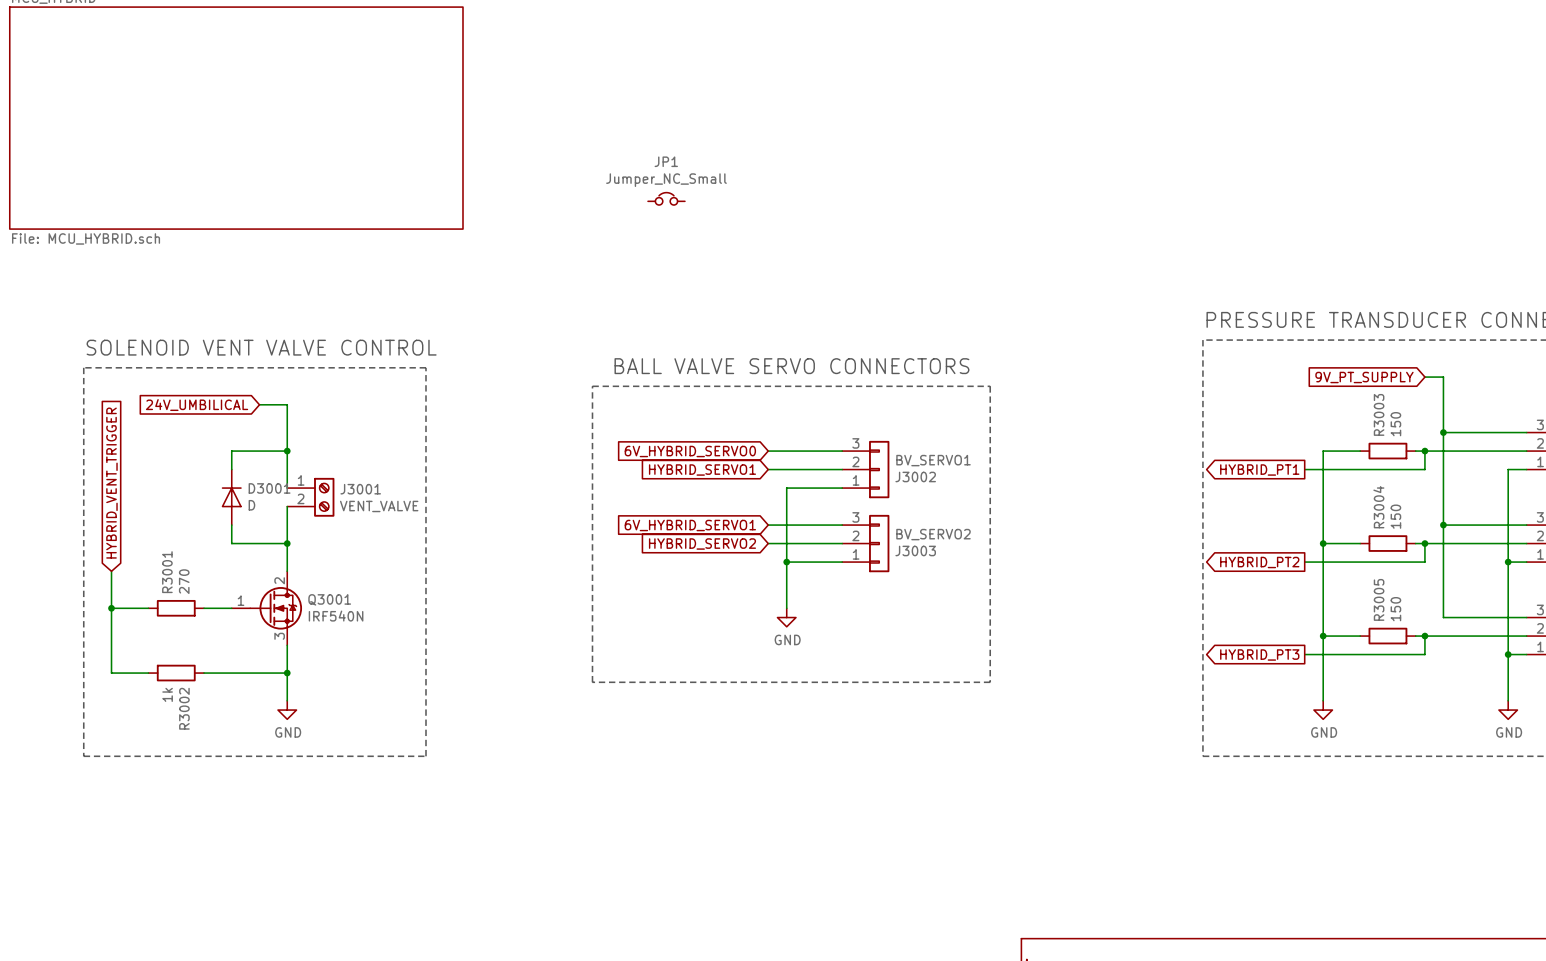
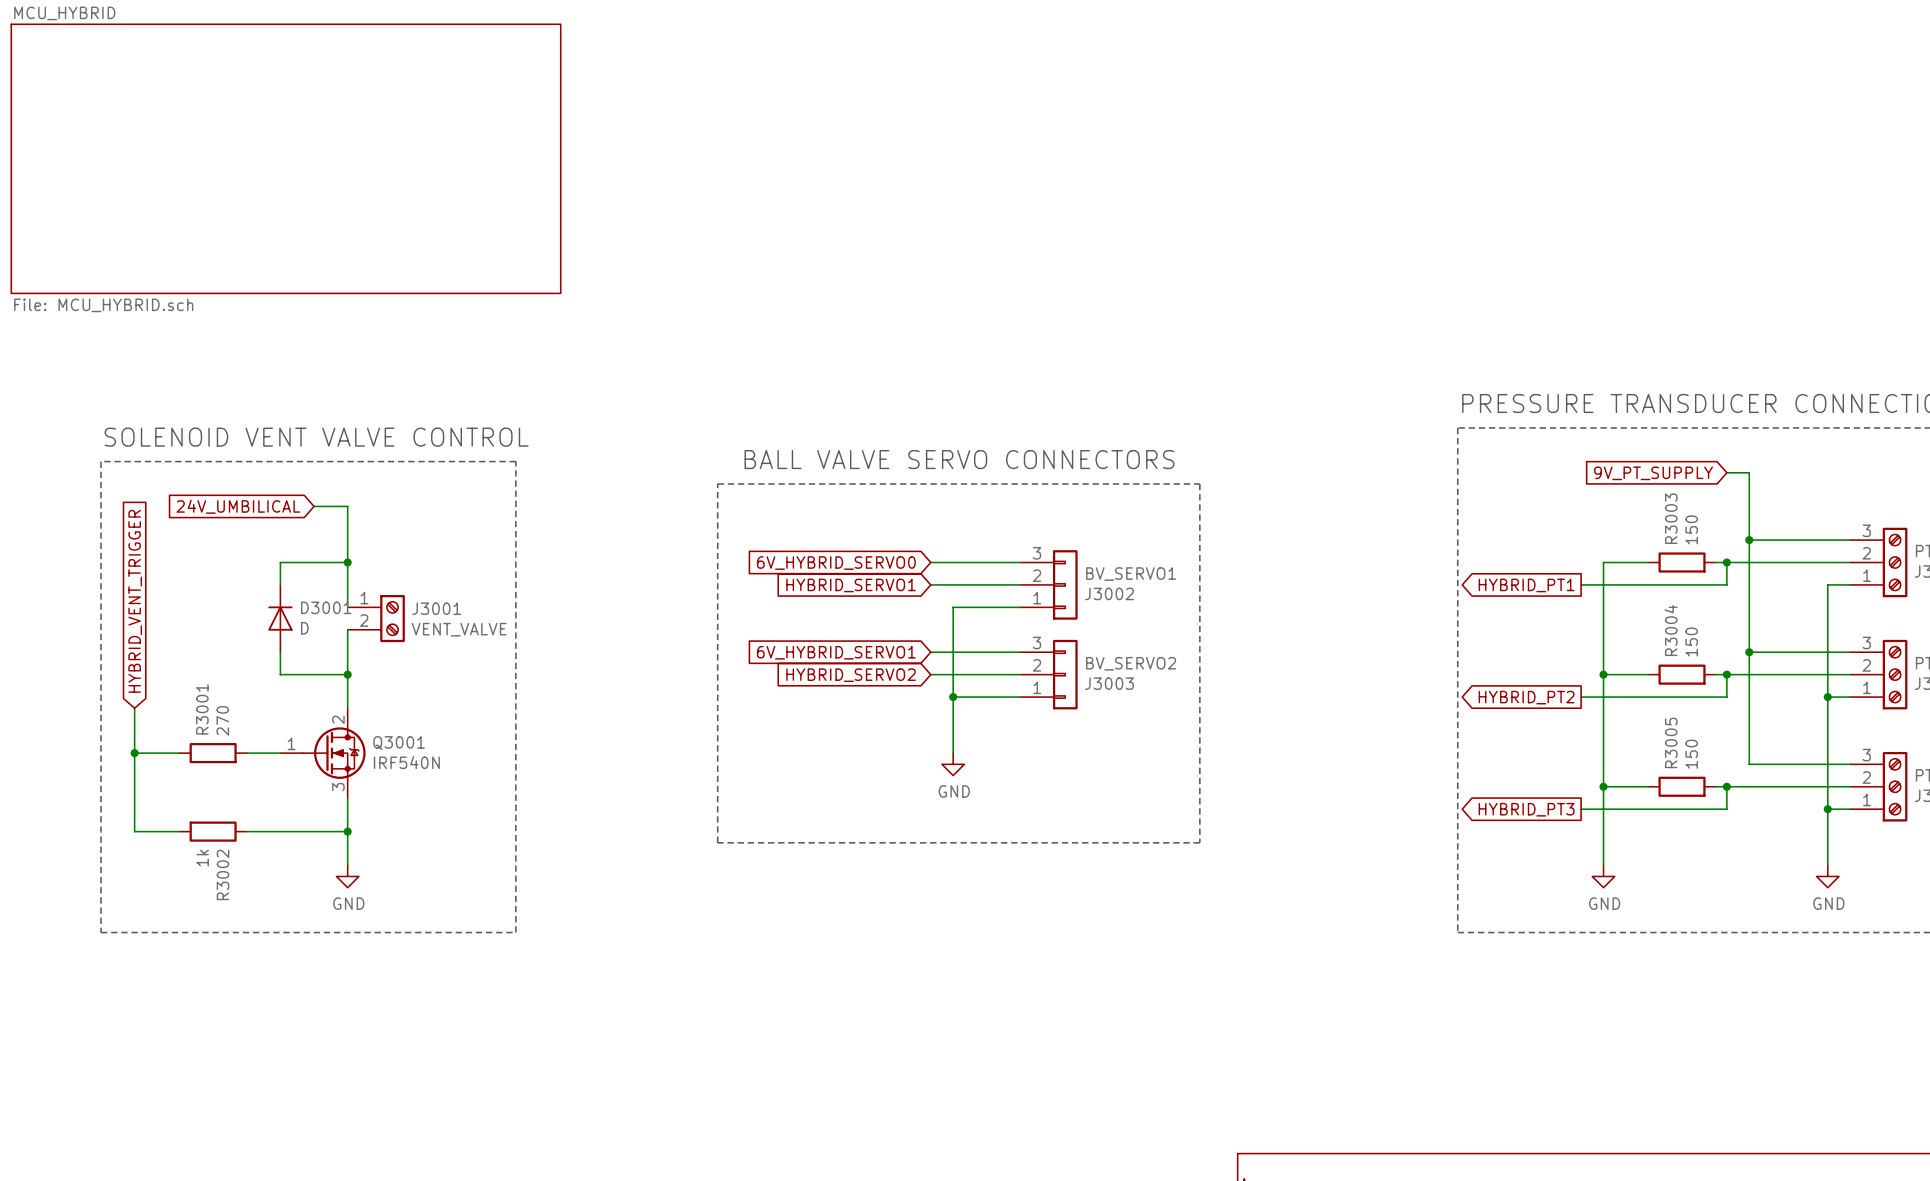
JP1: Jumper_NC_Small (666, 198) -> none

